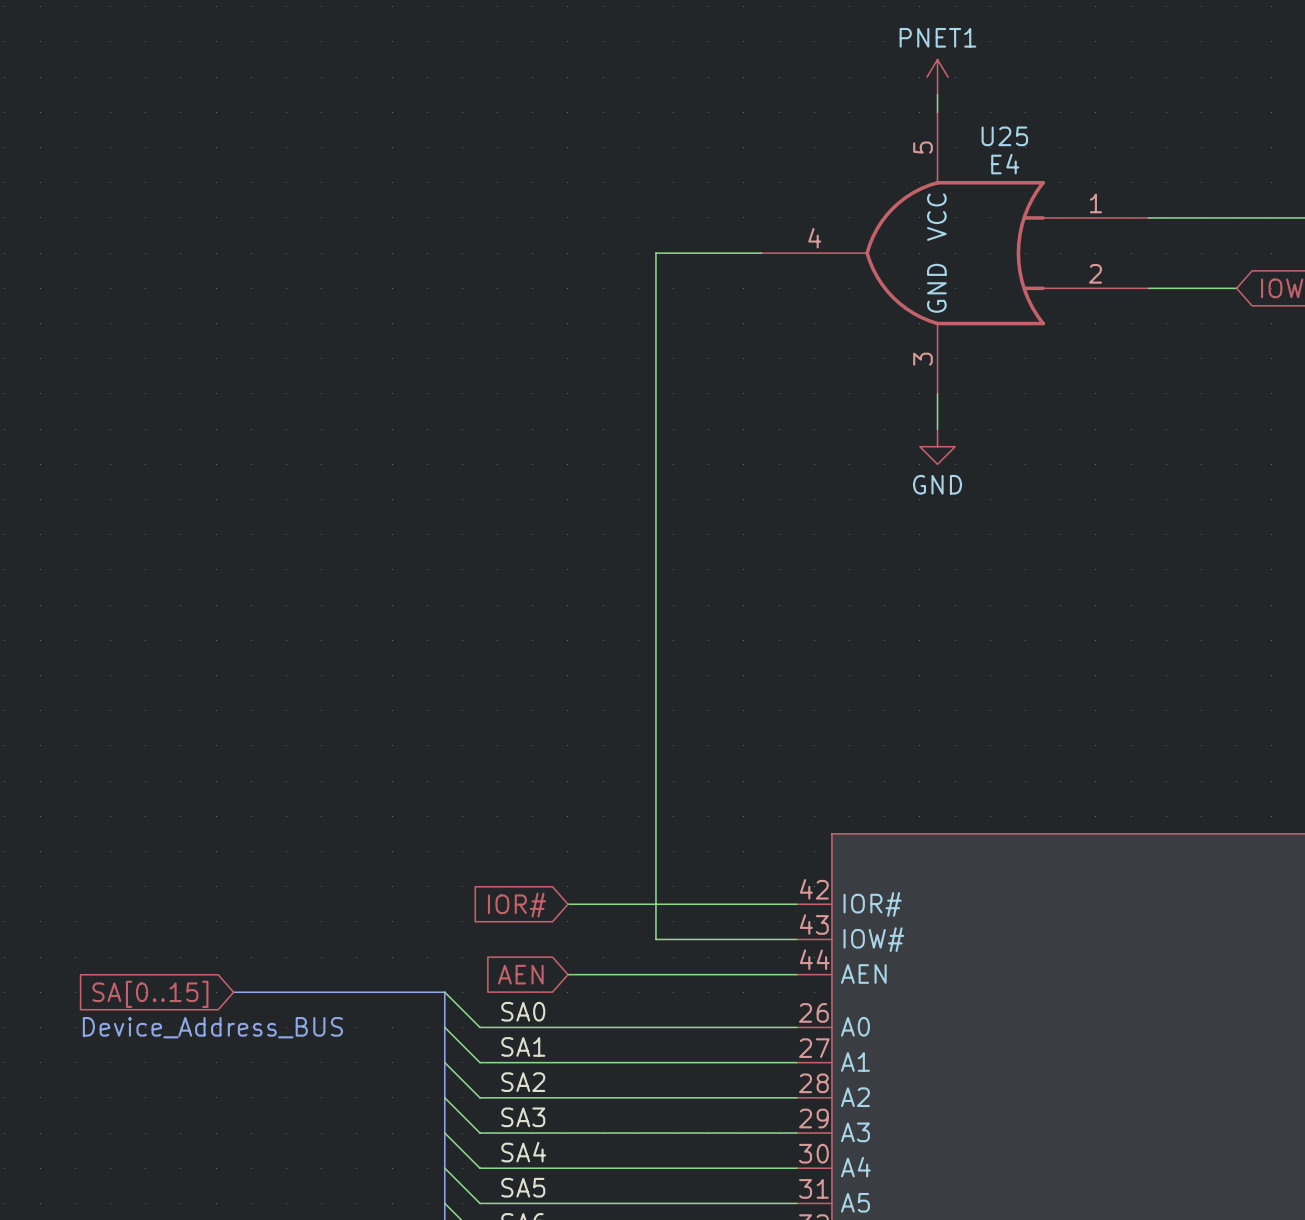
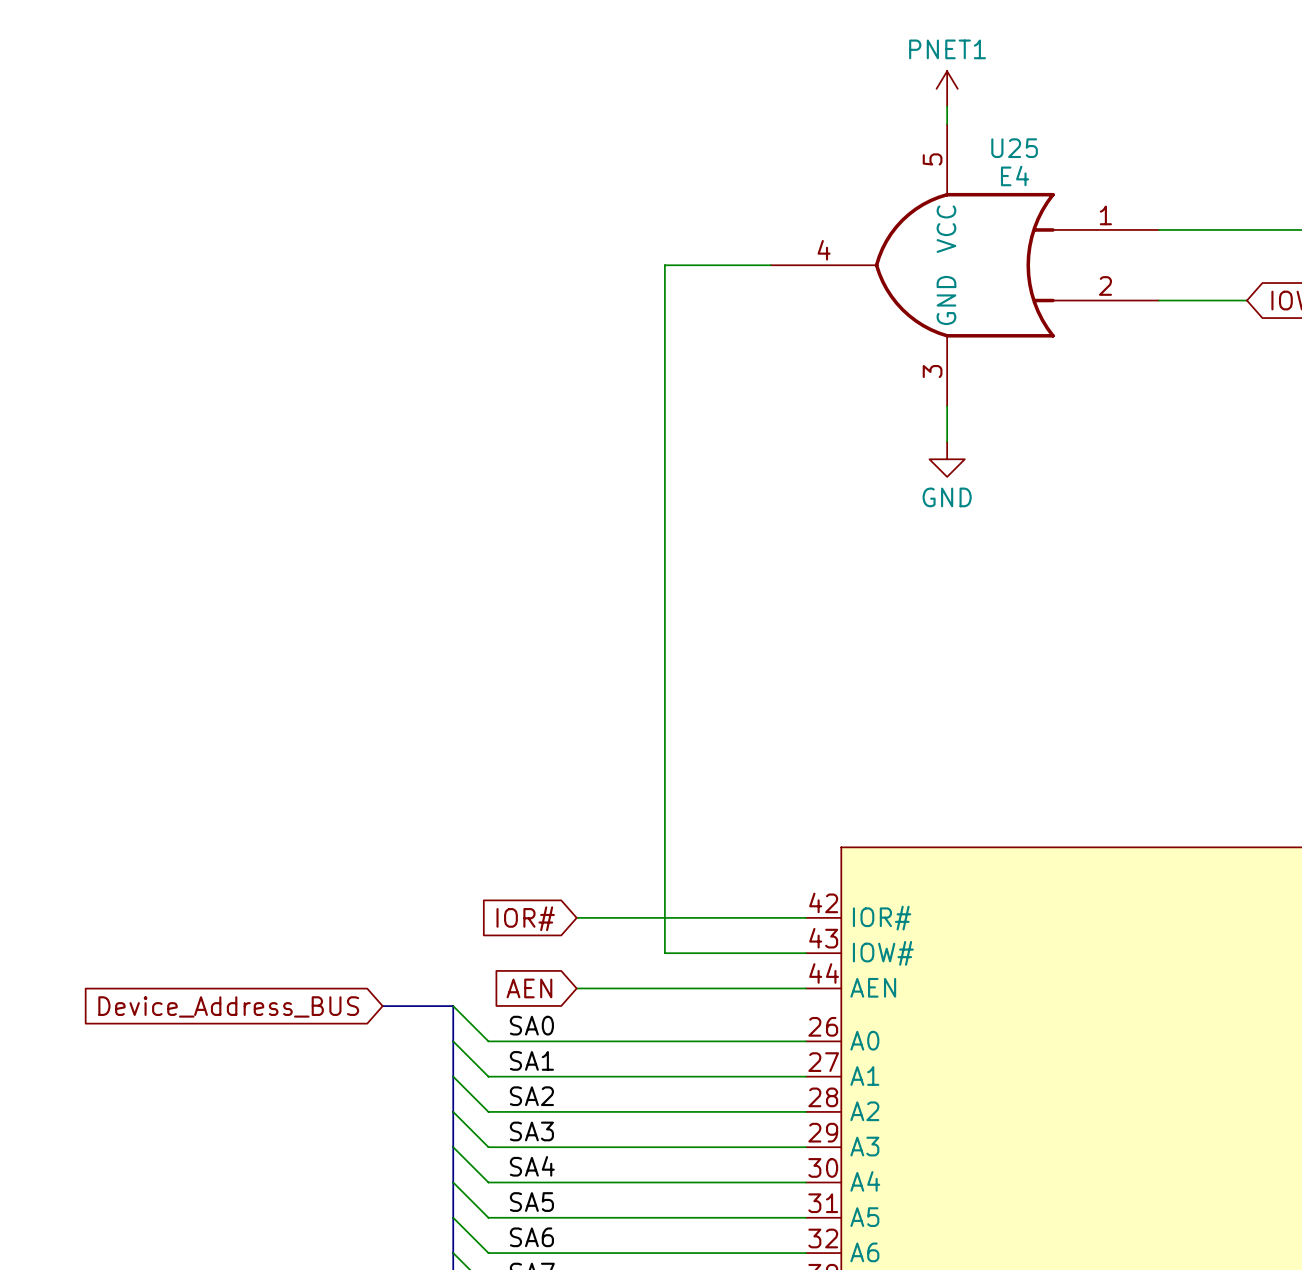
bus: (233, 992) (374, 992) -> none
global label: none -> Device_Address_BUS (228, 1006)
global label: SA[0..15] (150, 994) -> none
text: Device_Address_BUS (212, 1027) -> none

